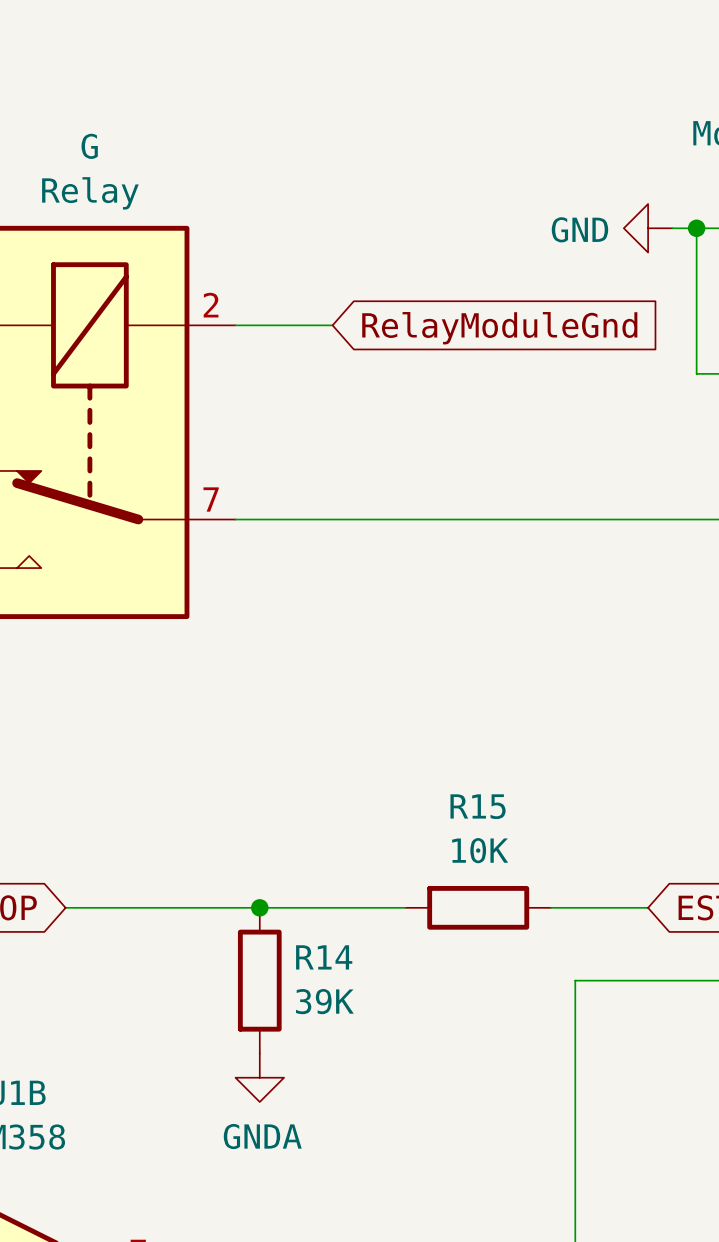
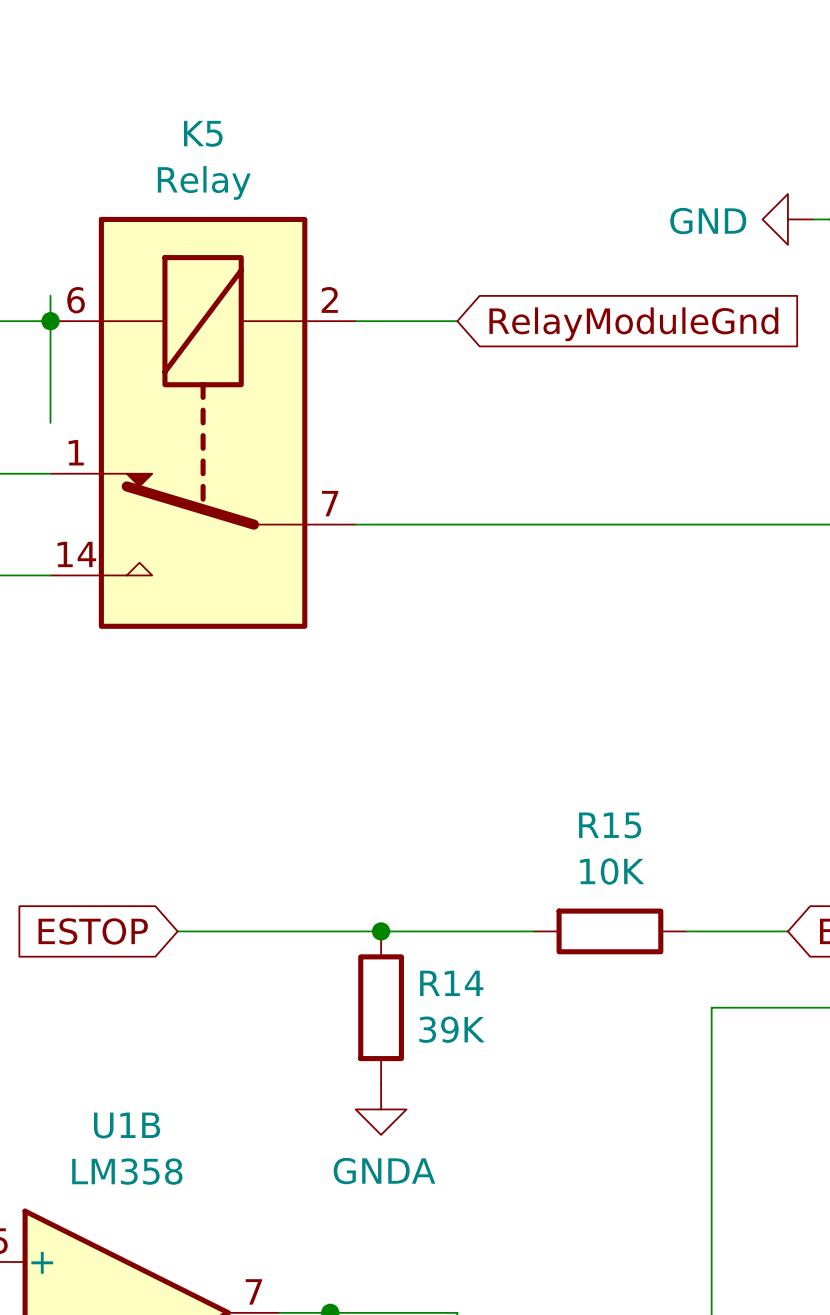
G name: G (89, 146) -> K5 (203, 133)

